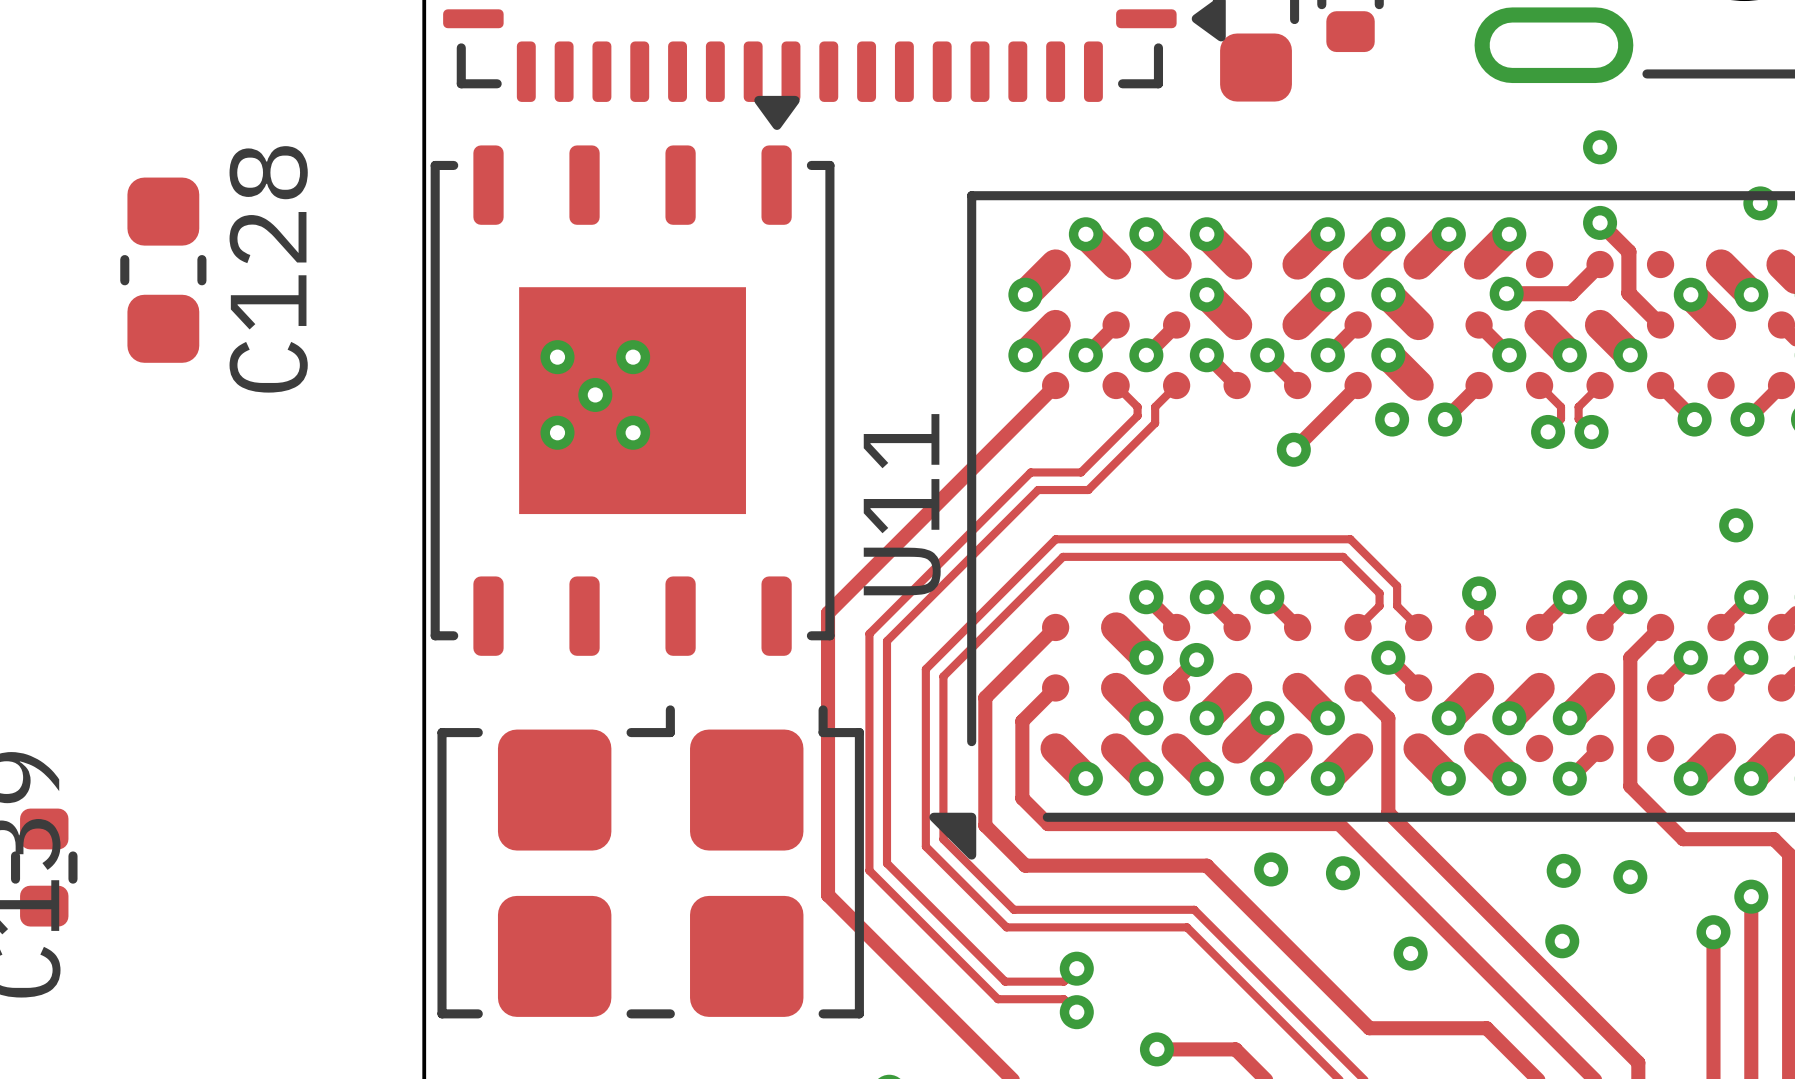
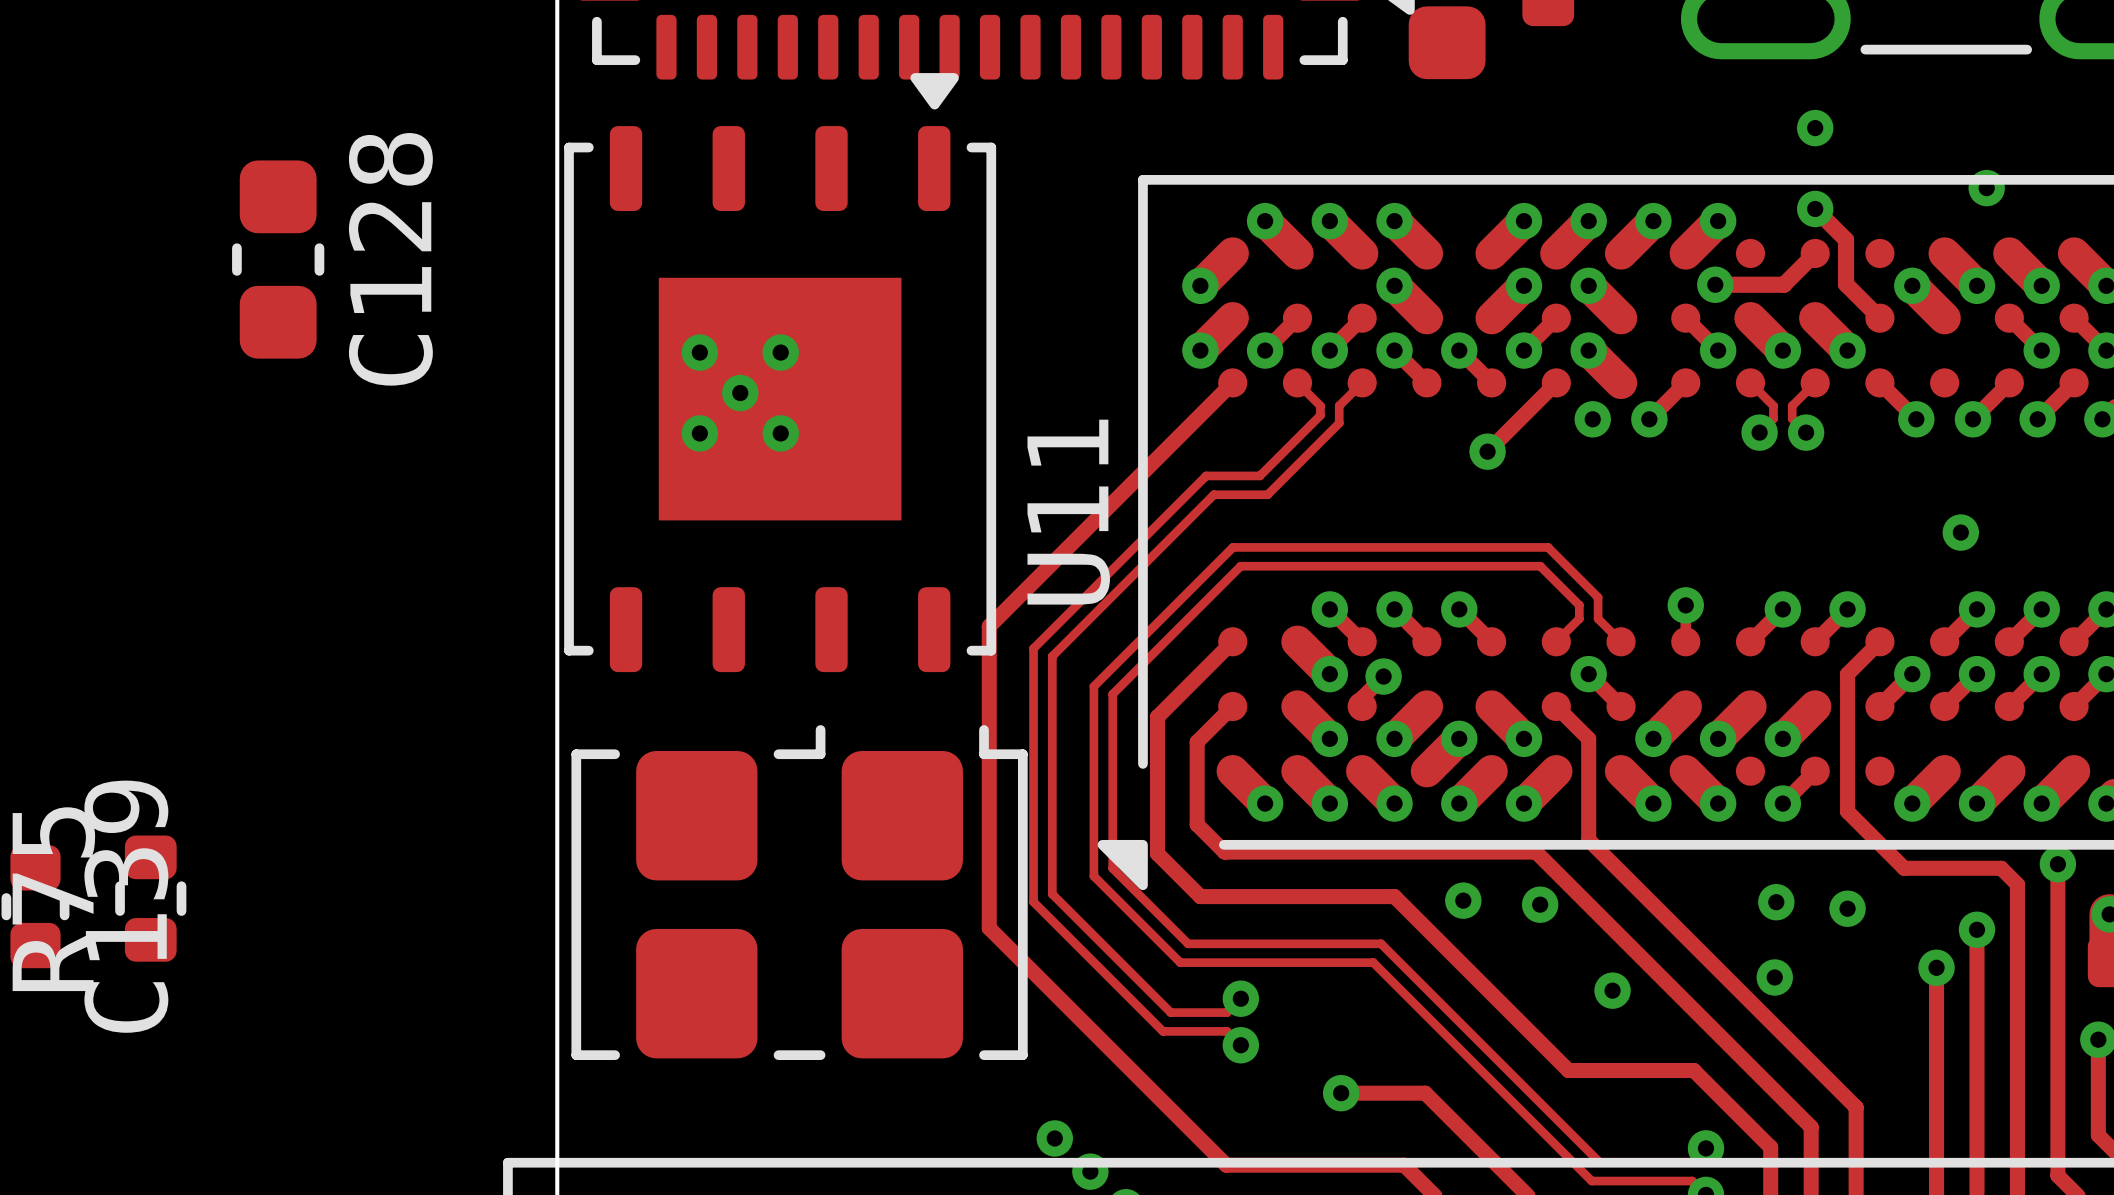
track: (1076, 968) (1063, 981) (1005, 981) (997, 974) -> (1240, 998) (1226, 1012) (1170, 1012)
via position: (1076, 968) -> (1240, 998)
track: (990, 991) (997, 999) (1063, 999) (1076, 1012) -> (1162, 1031) (1226, 1031) (1240, 1045)
via position: (1076, 1012) -> (1240, 1045)

